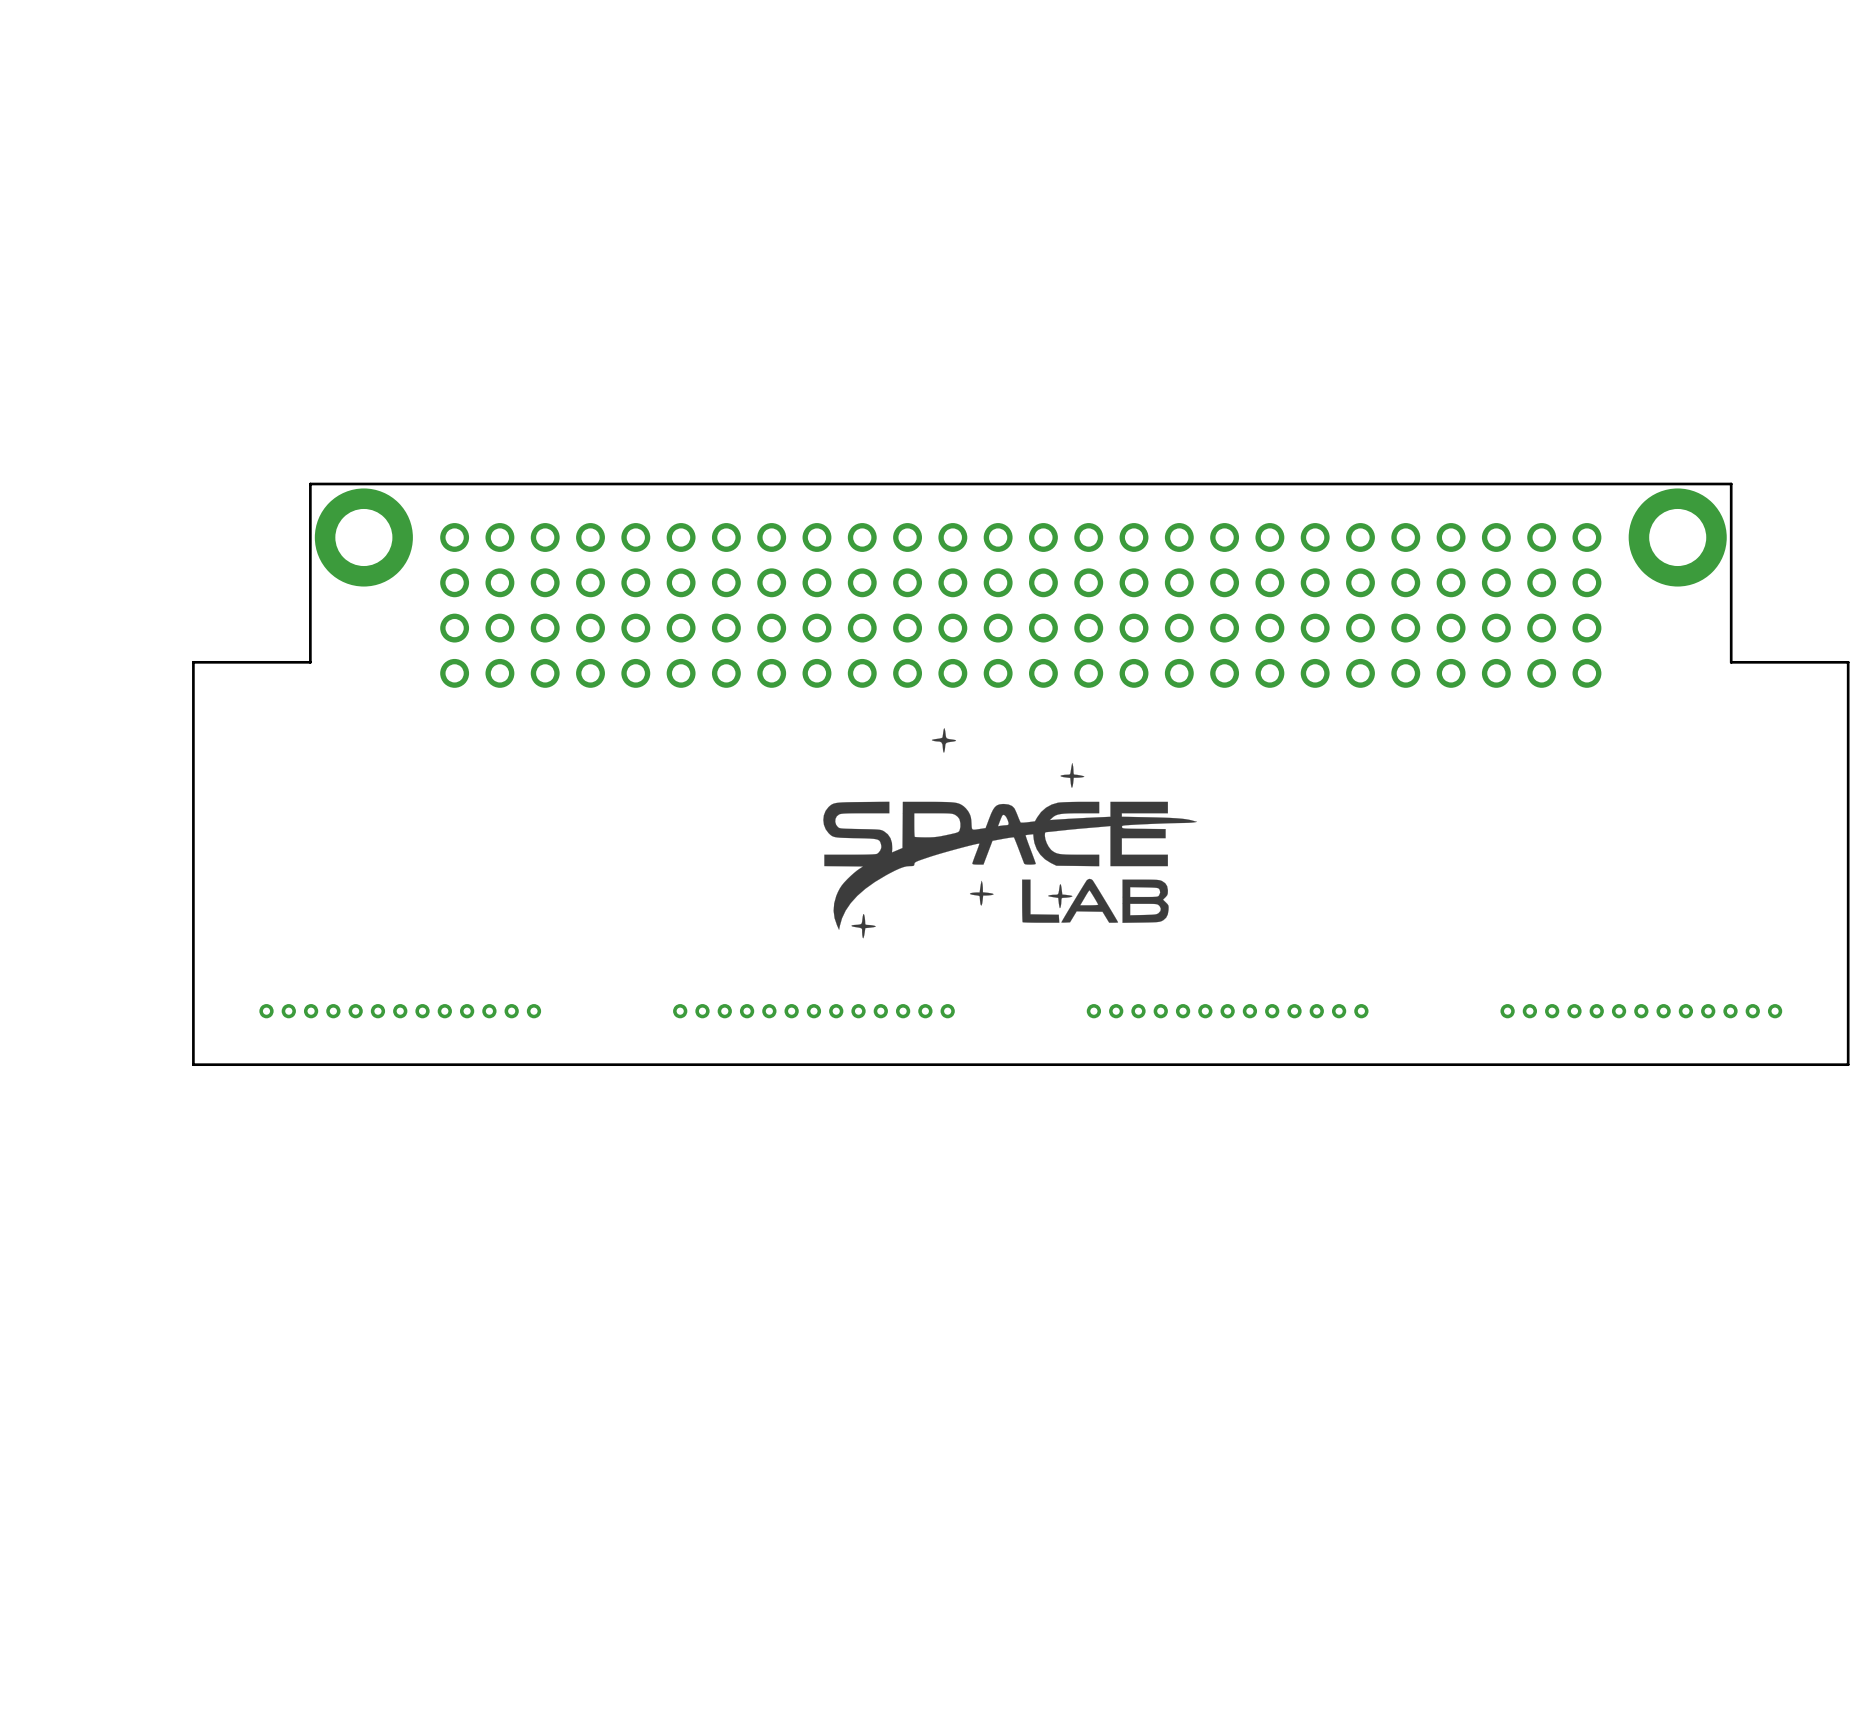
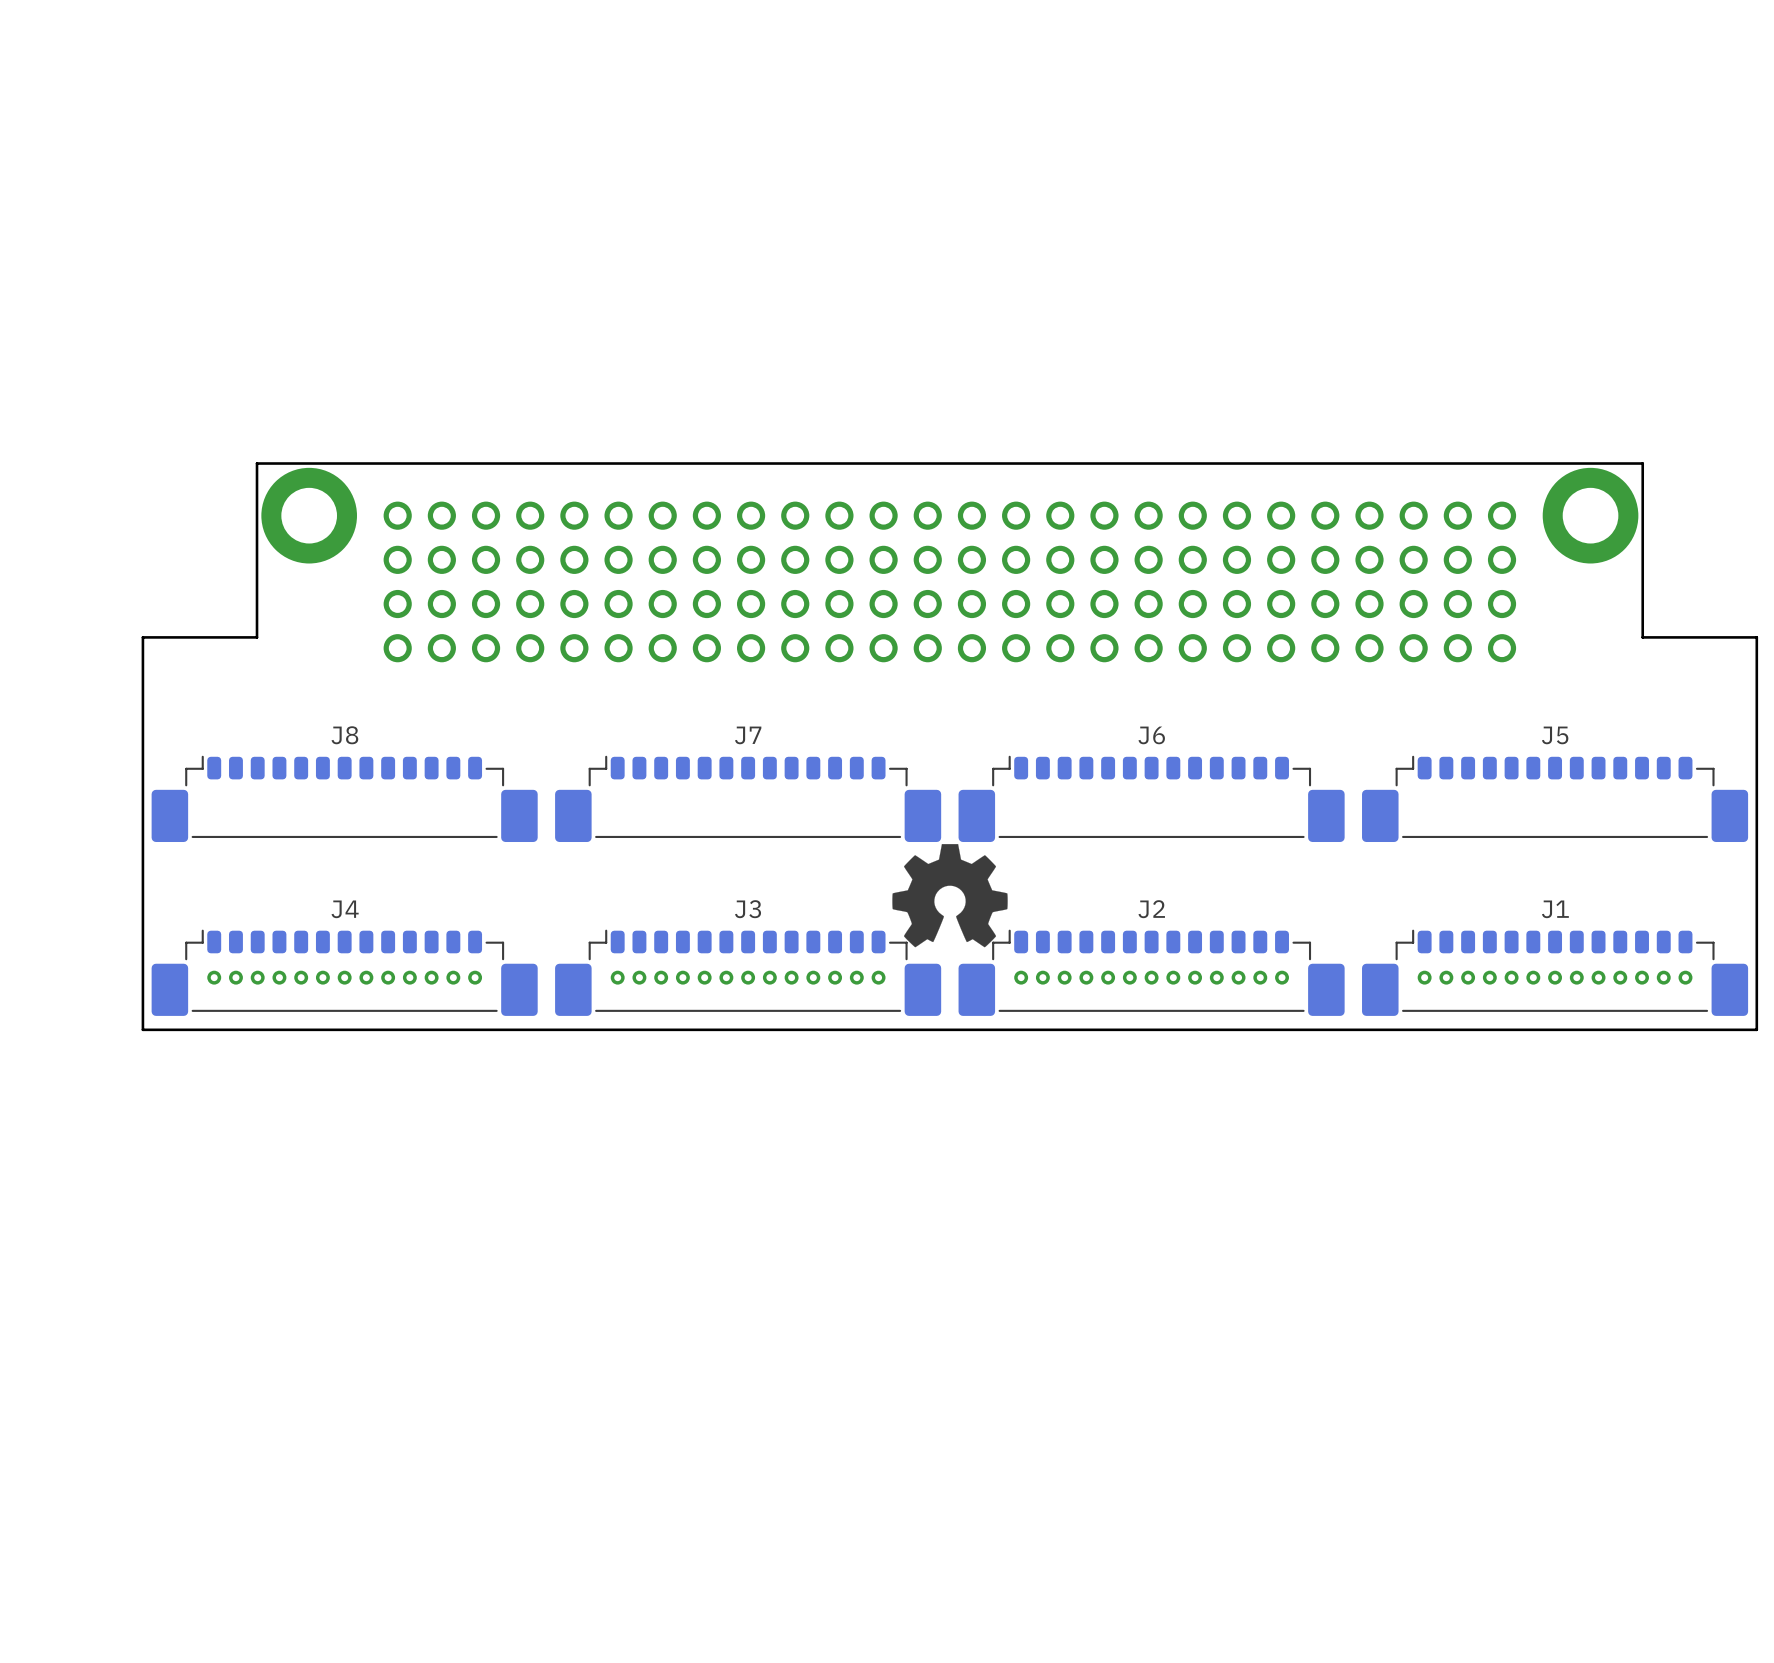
drawing: [823, 728, 1198, 939] -> none
J8: none -> (344, 798)
J7: none -> (748, 798)
J6: none -> (1151, 798)
J5: none -> (1555, 798)
drawing: none -> [892, 844, 1008, 948]
J4: none -> (344, 972)
J3: none -> (748, 972)
J2: none -> (1151, 972)
J1: none -> (1555, 972)

